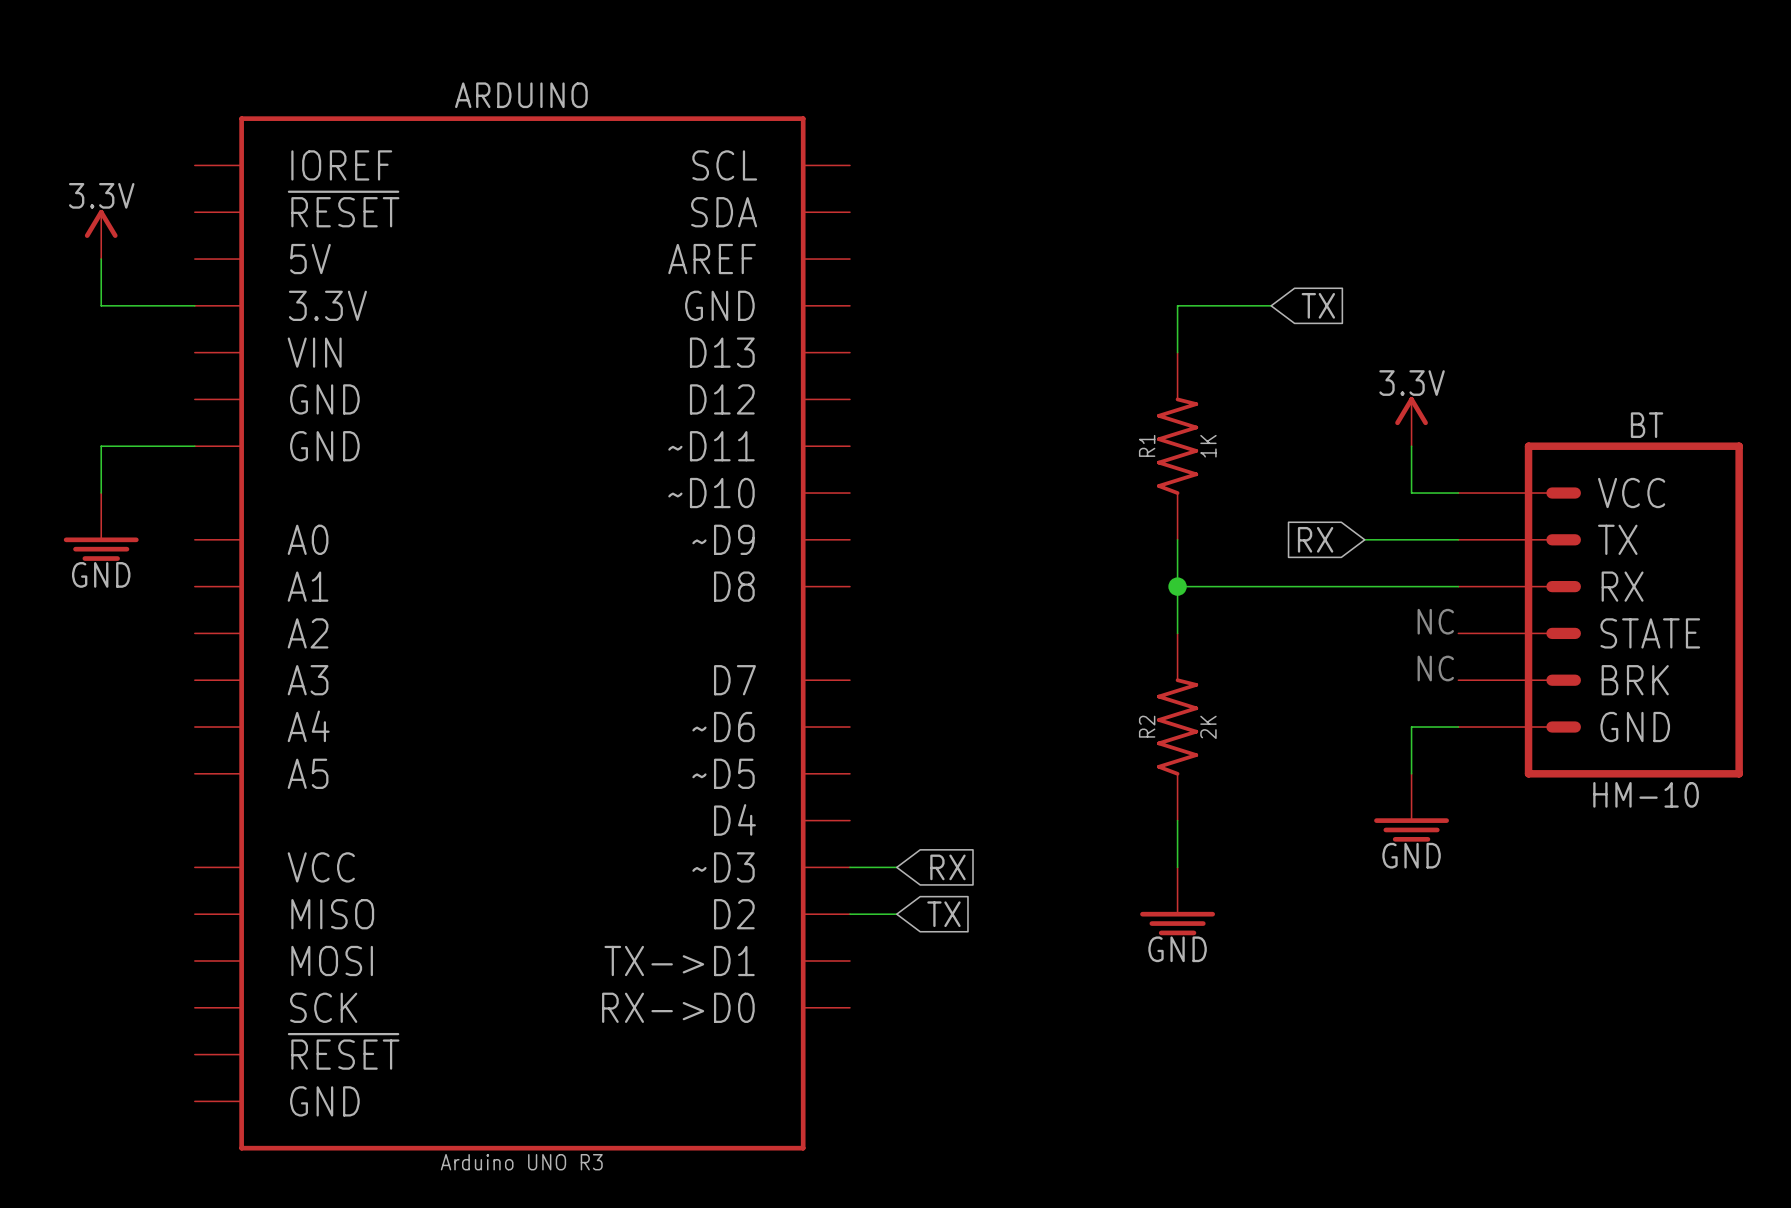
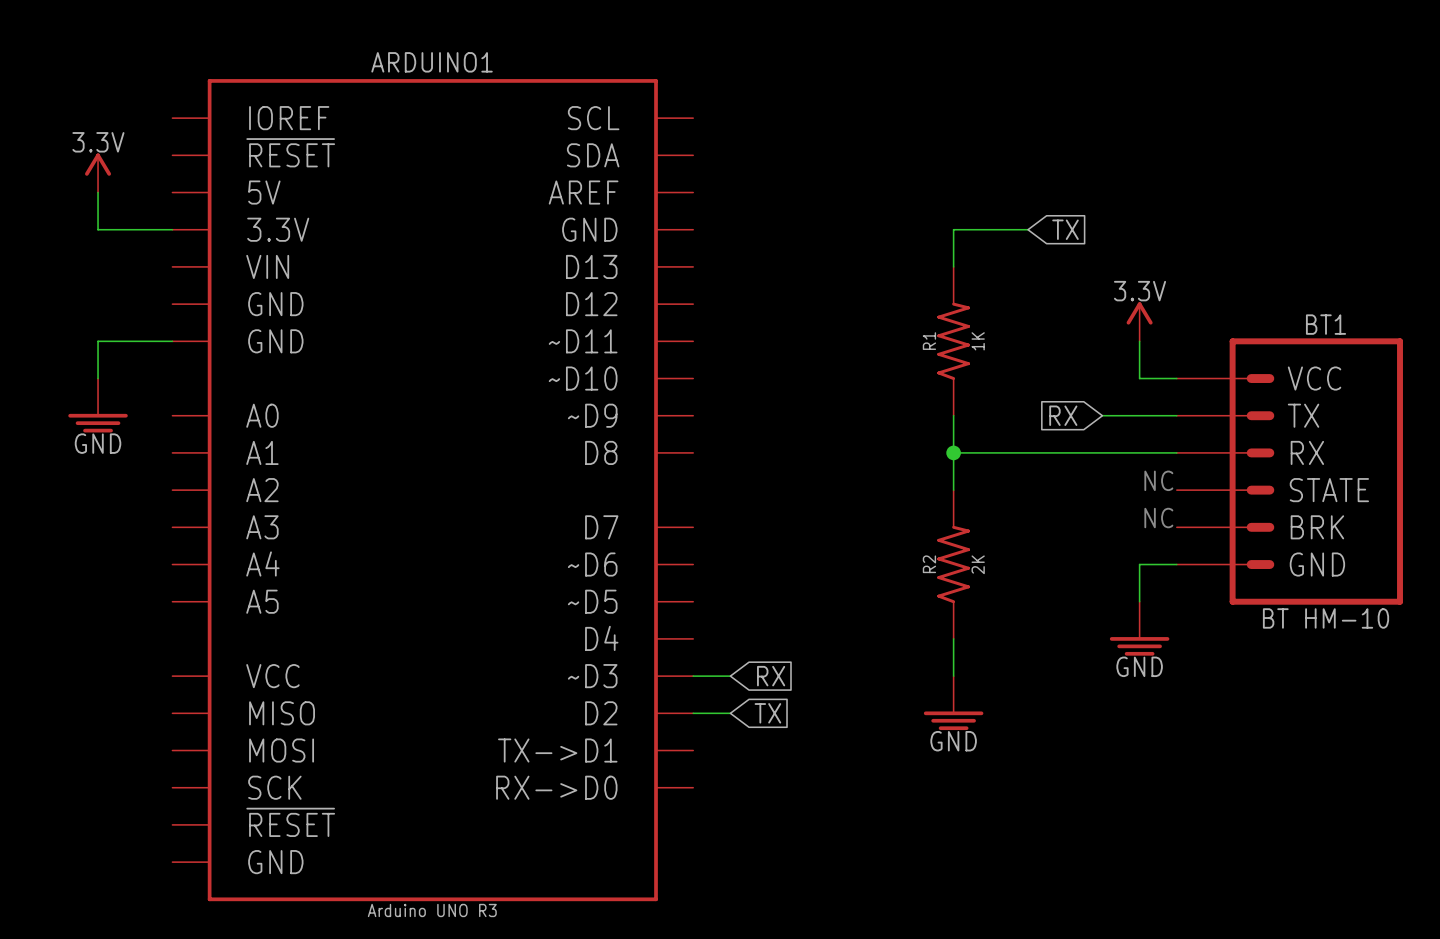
ARDUINO name: ARDUINO (521, 95) -> ARDUINO1 (432, 62)
BT name: BT (1647, 425) -> BT1 (1326, 324)
BT value: HM-10 (1646, 794) -> BT HM-10 (1326, 618)

